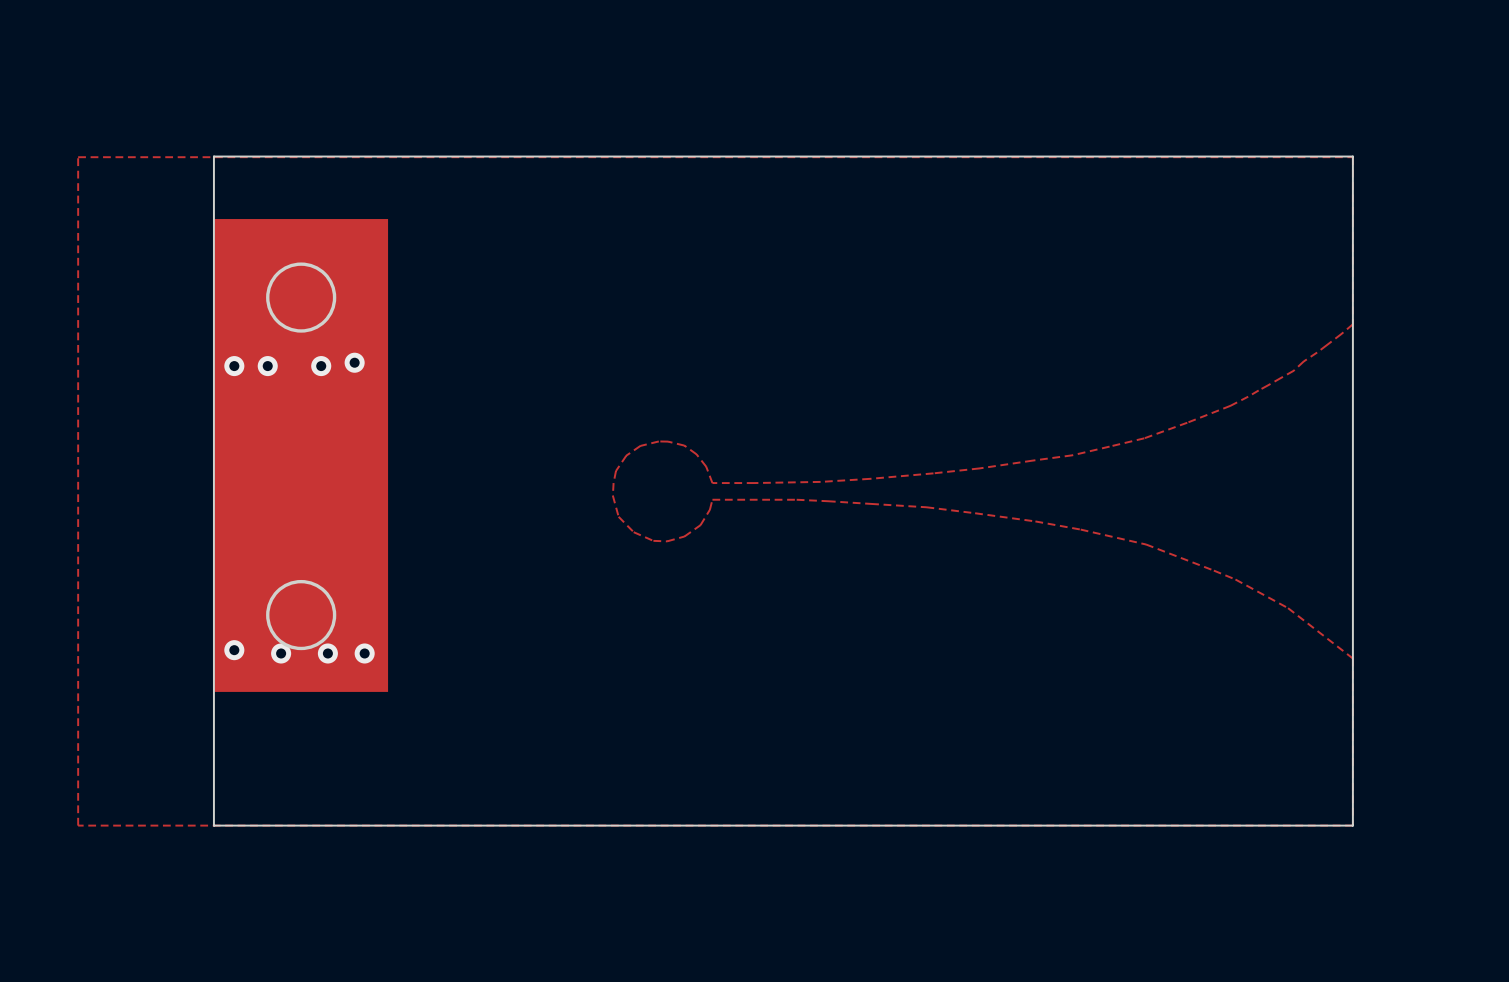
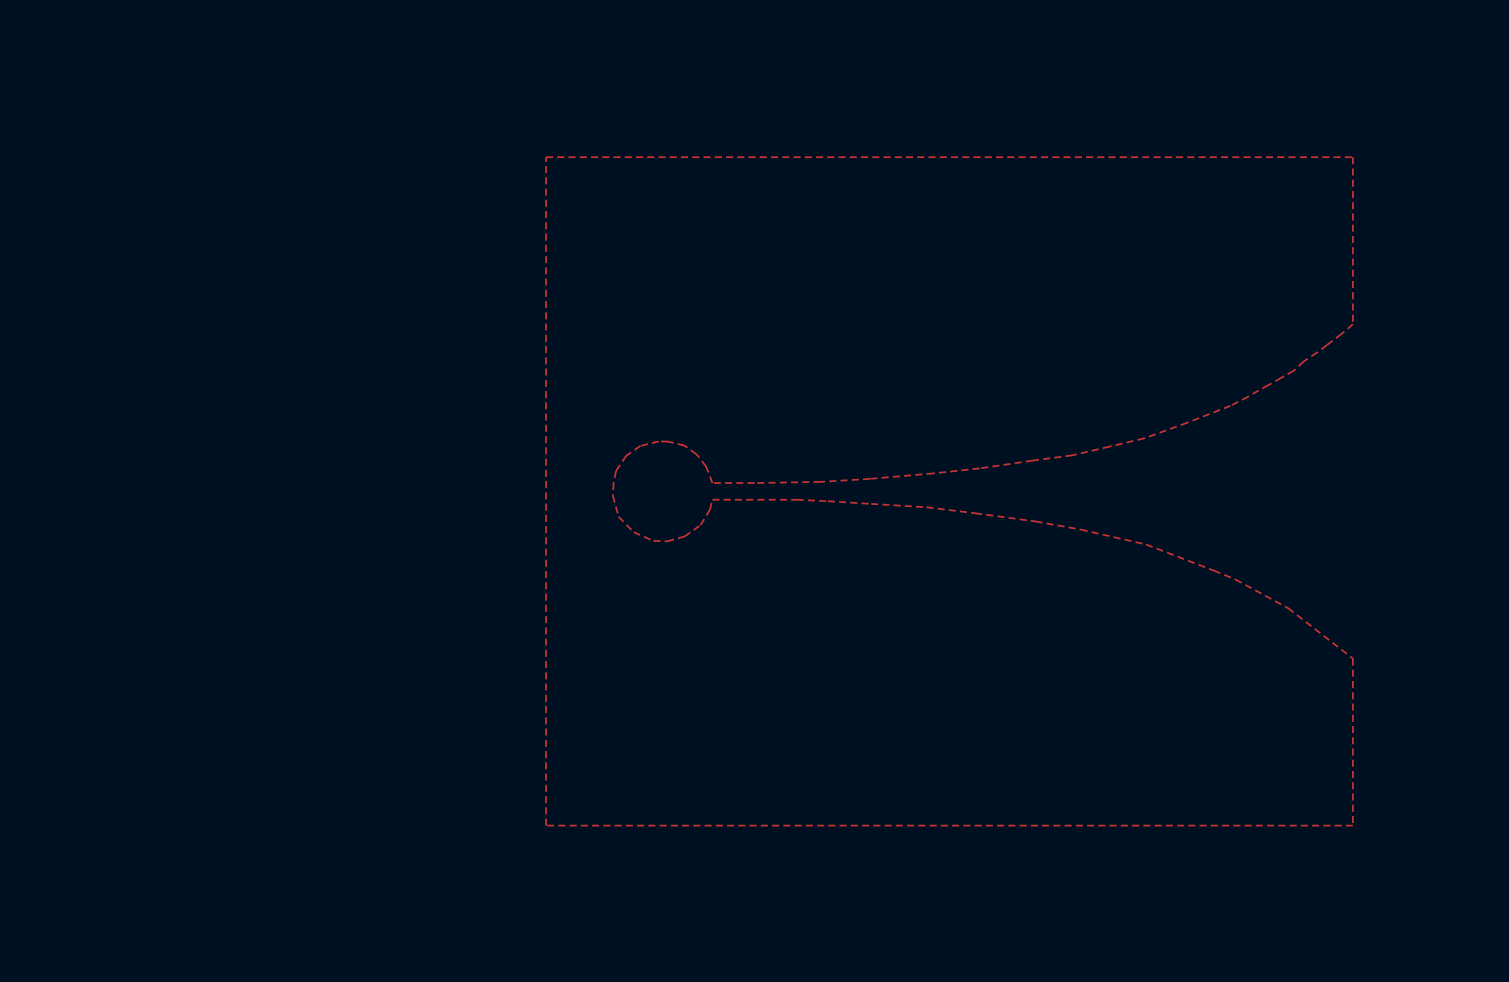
board edge: (213, 156) (1352, 156) (1352, 825) (213, 825) (213, 156) -> none
zone outline: (546, 157) (78, 157) (78, 825) (546, 825) -> (546, 157) (546, 825)
via: (354, 362) -> none
via: (234, 366) -> none
via: (267, 366) -> none
via: (321, 366) -> none
part: (301, 455) -> none
via: (234, 650) -> none
via: (281, 653) -> none
via: (327, 653) -> none
via: (364, 653) -> none

